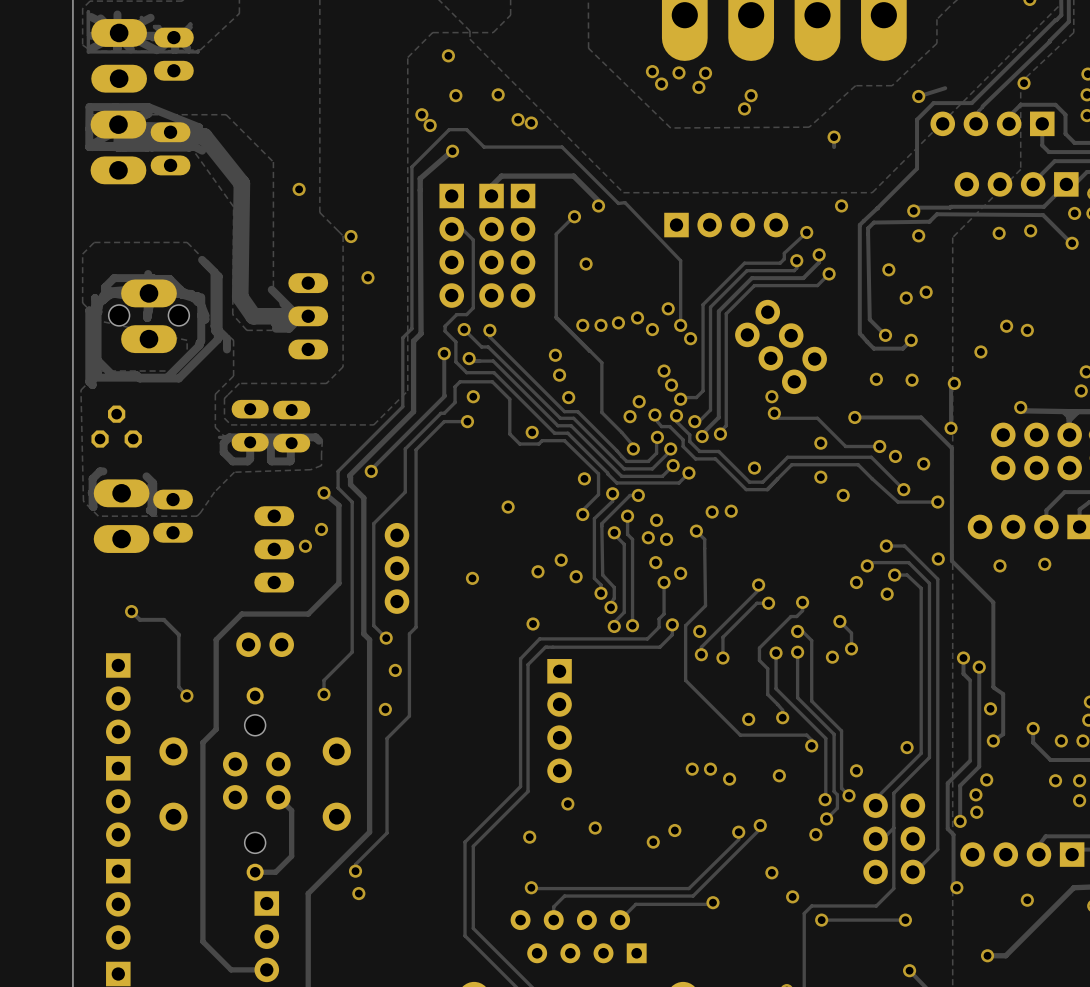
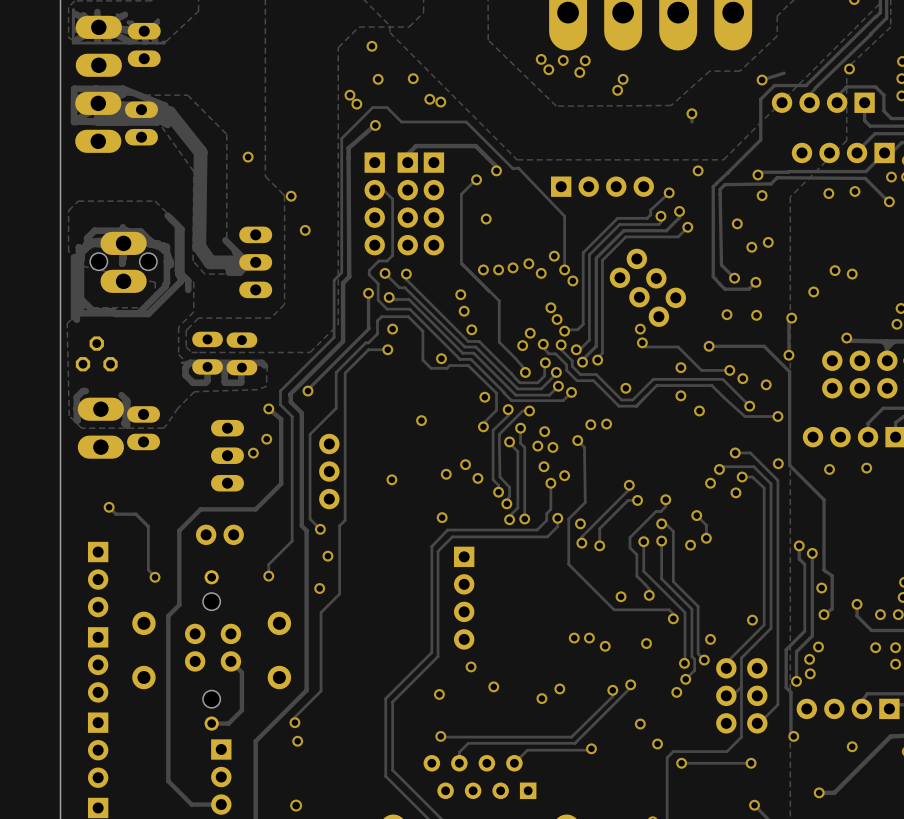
via: none -> (296, 805)

